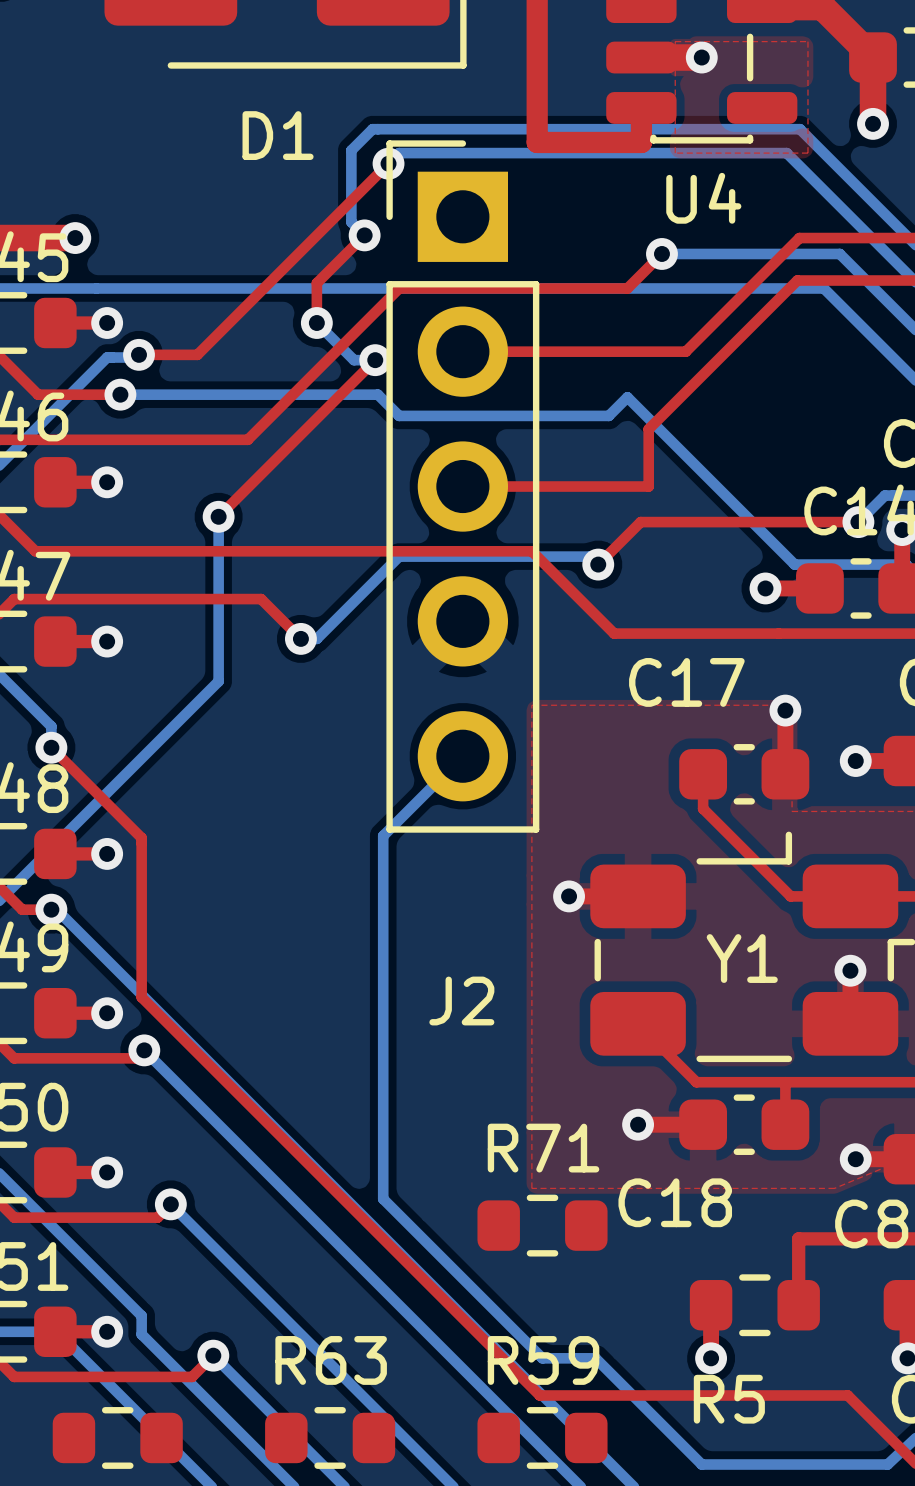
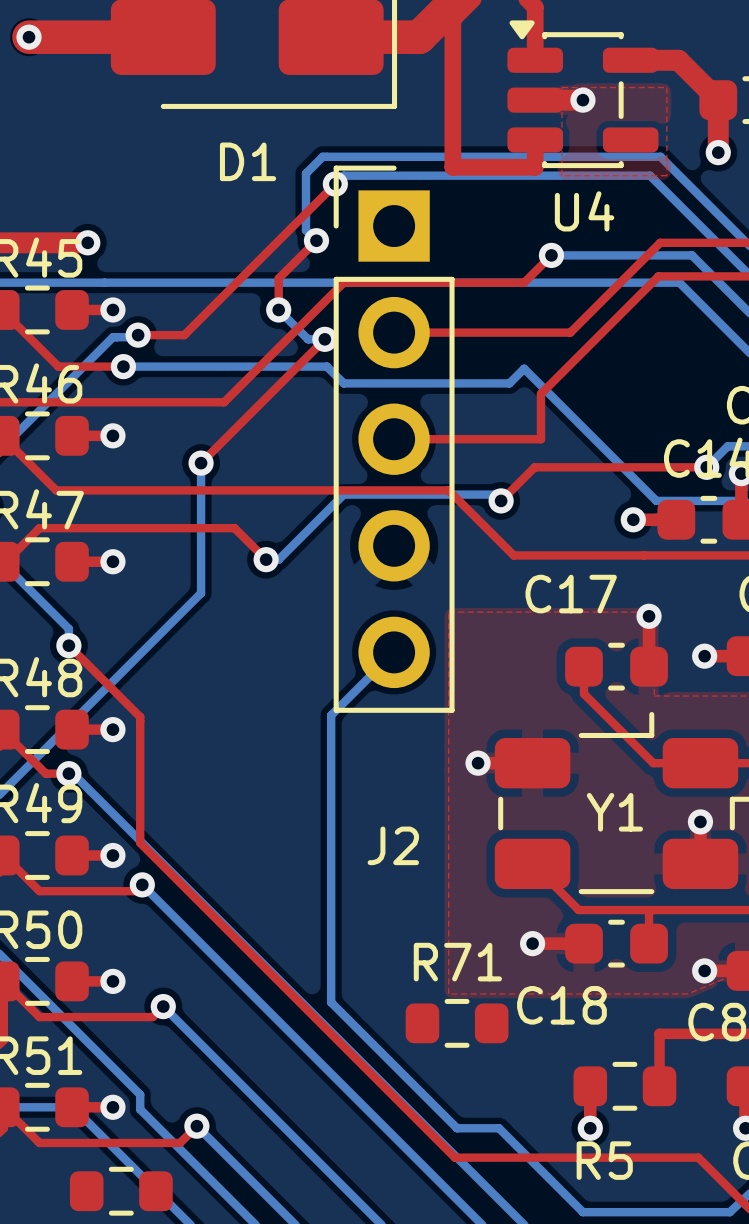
R63: (330, 1437) -> none
R59: (542, 1437) -> none

